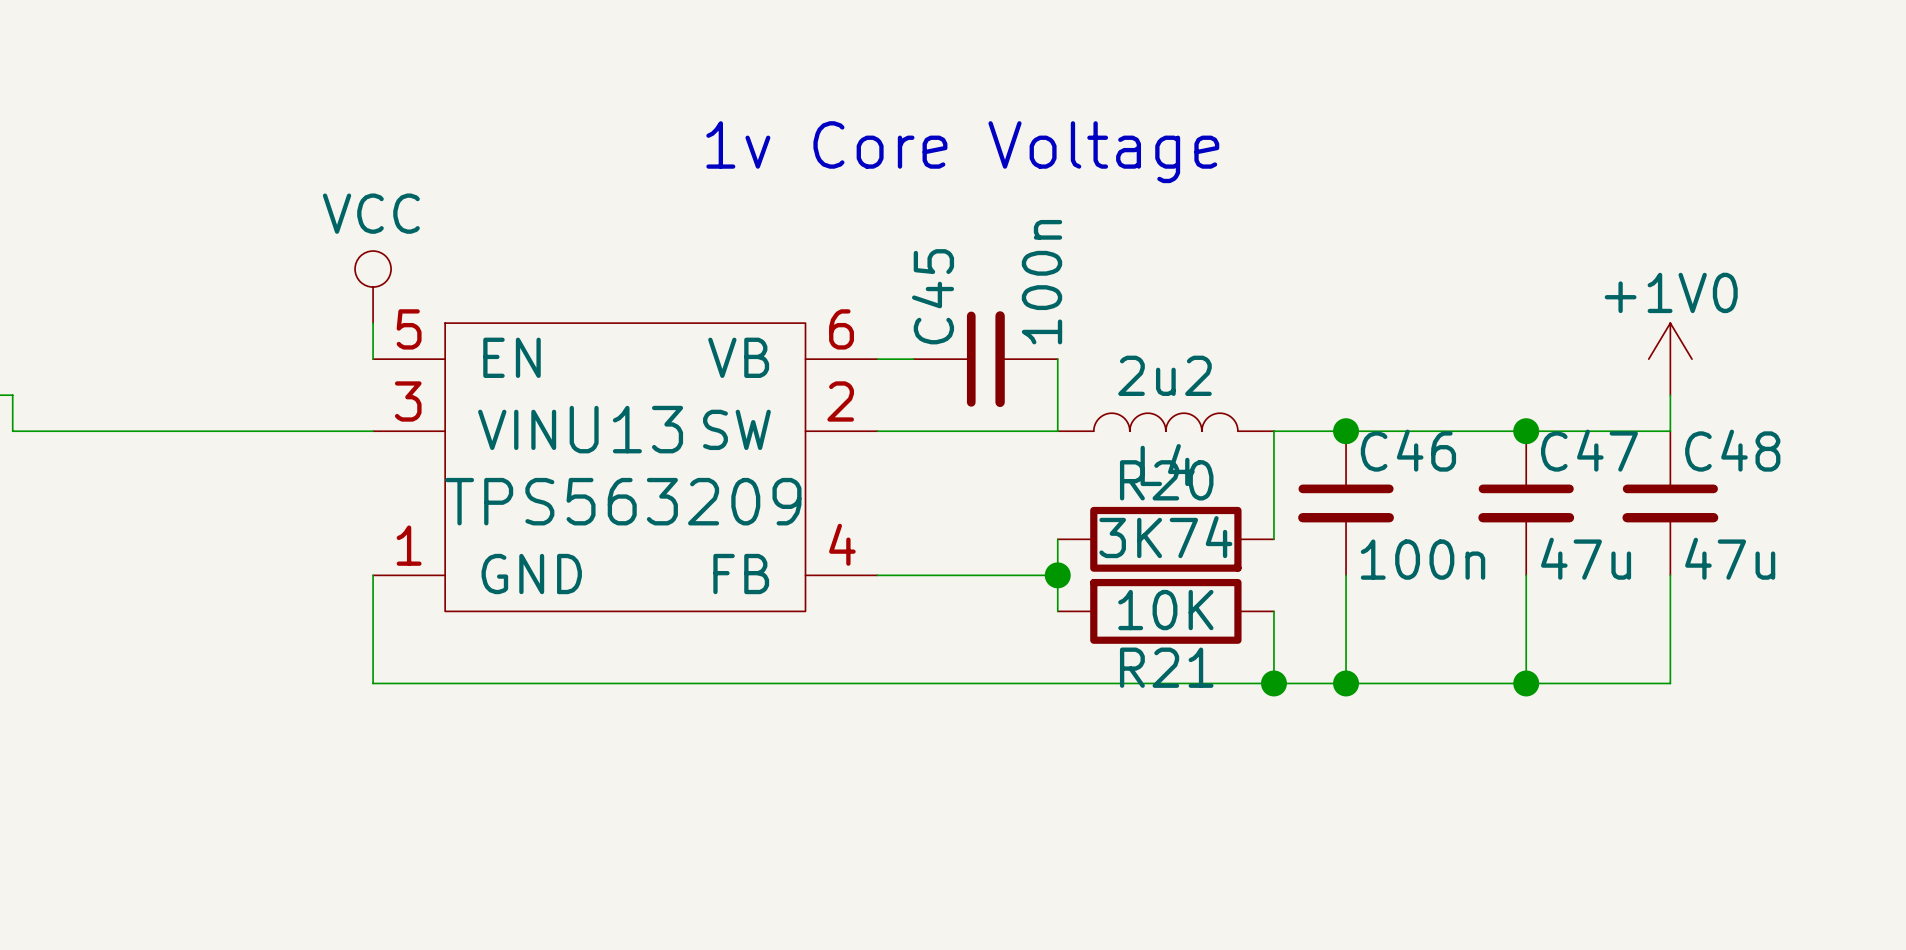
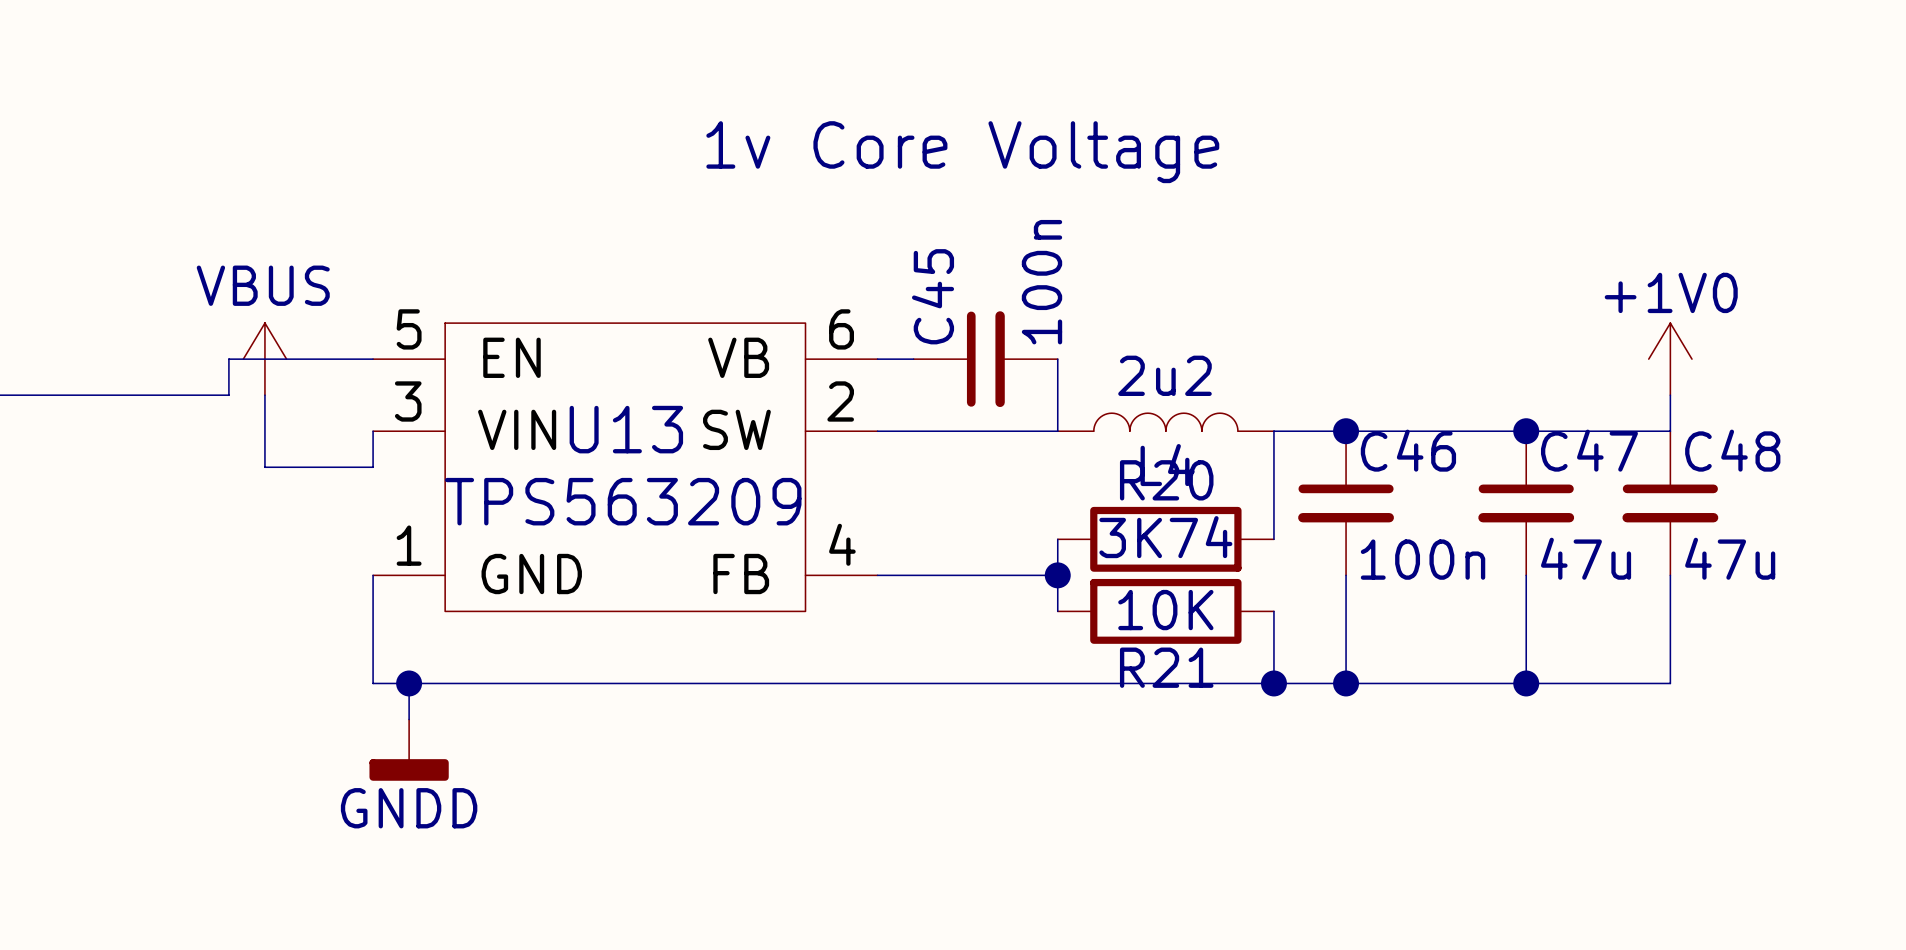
power symbol: VCC (373, 287) -> none
wire: (373, 323) (373, 359) -> (409, 683) (409, 719)
power symbol: none -> VBUS (264, 359)
wire: (12, 395) (12, 431) (373, 431) -> (12, 395) (228, 395) (228, 359) (373, 359)
wire: none -> (264, 395) (264, 467) (373, 467) (373, 431)
junction: none -> (409, 683)
power symbol: none -> GNDD (409, 750)

